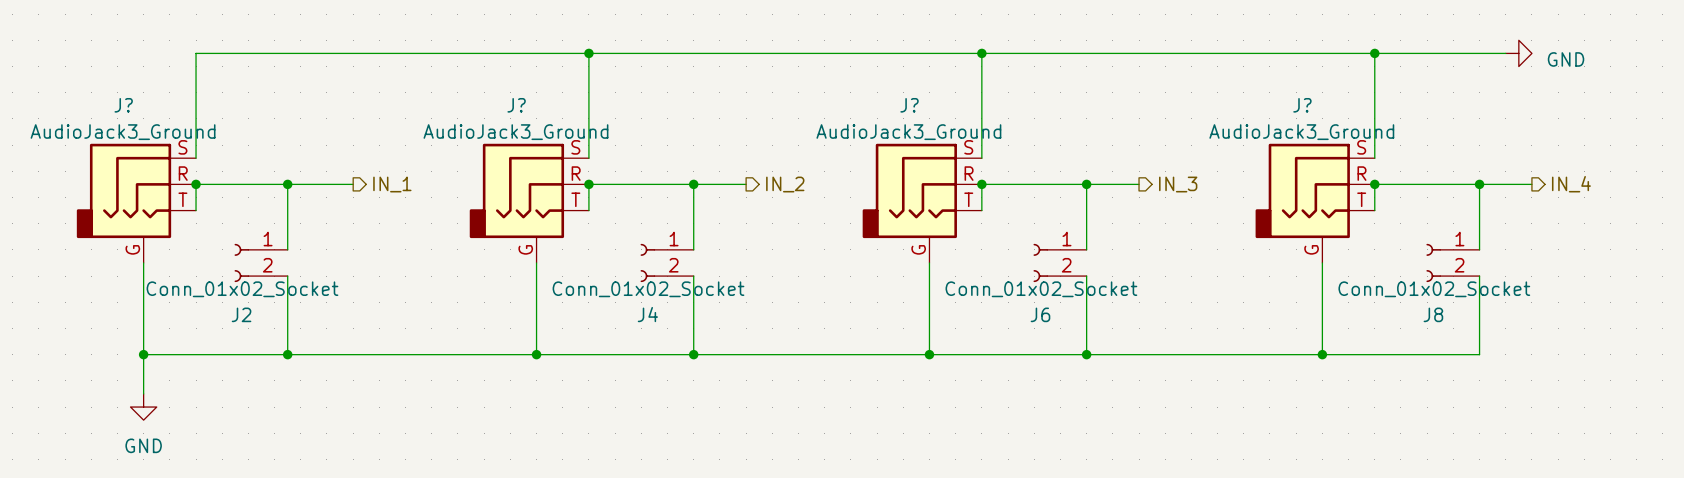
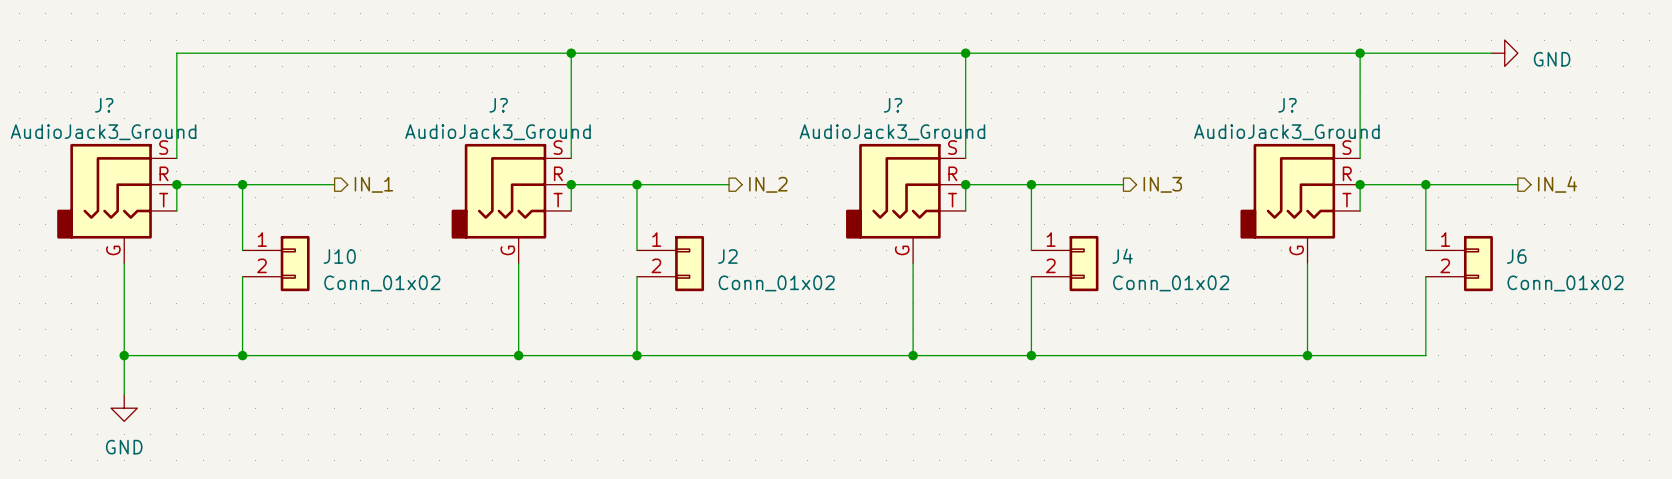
wire: (287, 184) (287, 249) -> (242, 184) (242, 250)
junction position: (287, 184) -> (242, 184)
wire: (693, 184) (693, 249) -> (636, 184) (636, 250)
junction position: (693, 184) -> (636, 184)
wire: (1086, 184) (1086, 249) -> (1031, 184) (1031, 250)
junction position: (1086, 184) -> (1031, 184)
wire: (1479, 184) (1479, 249) -> (1425, 184) (1425, 250)
junction position: (1479, 184) -> (1425, 184)
J2 symbol: [234, 243, 288, 283] -> [636, 235, 705, 292]
J4 symbol: [640, 243, 694, 283] -> [1031, 235, 1099, 292]
J6 symbol: [1033, 243, 1087, 283] -> [1425, 235, 1493, 292]
J10: none -> Conn_01x02 (276, 263)
J8: Conn_01x02_Socket (1452, 262) -> none
wire: (287, 276) (287, 354) -> (242, 276) (242, 355)
wire: (693, 276) (693, 354) -> (636, 276) (636, 355)
wire: (1086, 276) (1086, 354) -> (1031, 276) (1031, 355)
wire: (1479, 276) (1479, 354) (1440, 354) -> (1425, 276) (1425, 355)
J2 value: Conn_01x02_Socket (242, 289) -> Conn_01x02 (776, 283)
J4 value: Conn_01x02_Socket (648, 289) -> Conn_01x02 (1171, 283)
J6 value: Conn_01x02_Socket (1041, 289) -> Conn_01x02 (1565, 283)
J2 name position: J2 (241, 314) -> J2 (727, 256)
J4 name position: J4 (647, 314) -> J4 (1122, 256)
J6 name position: J6 (1040, 314) -> J6 (1516, 256)
junction position: (287, 354) -> (242, 355)
junction position: (693, 354) -> (636, 355)
junction position: (1086, 354) -> (1031, 355)

